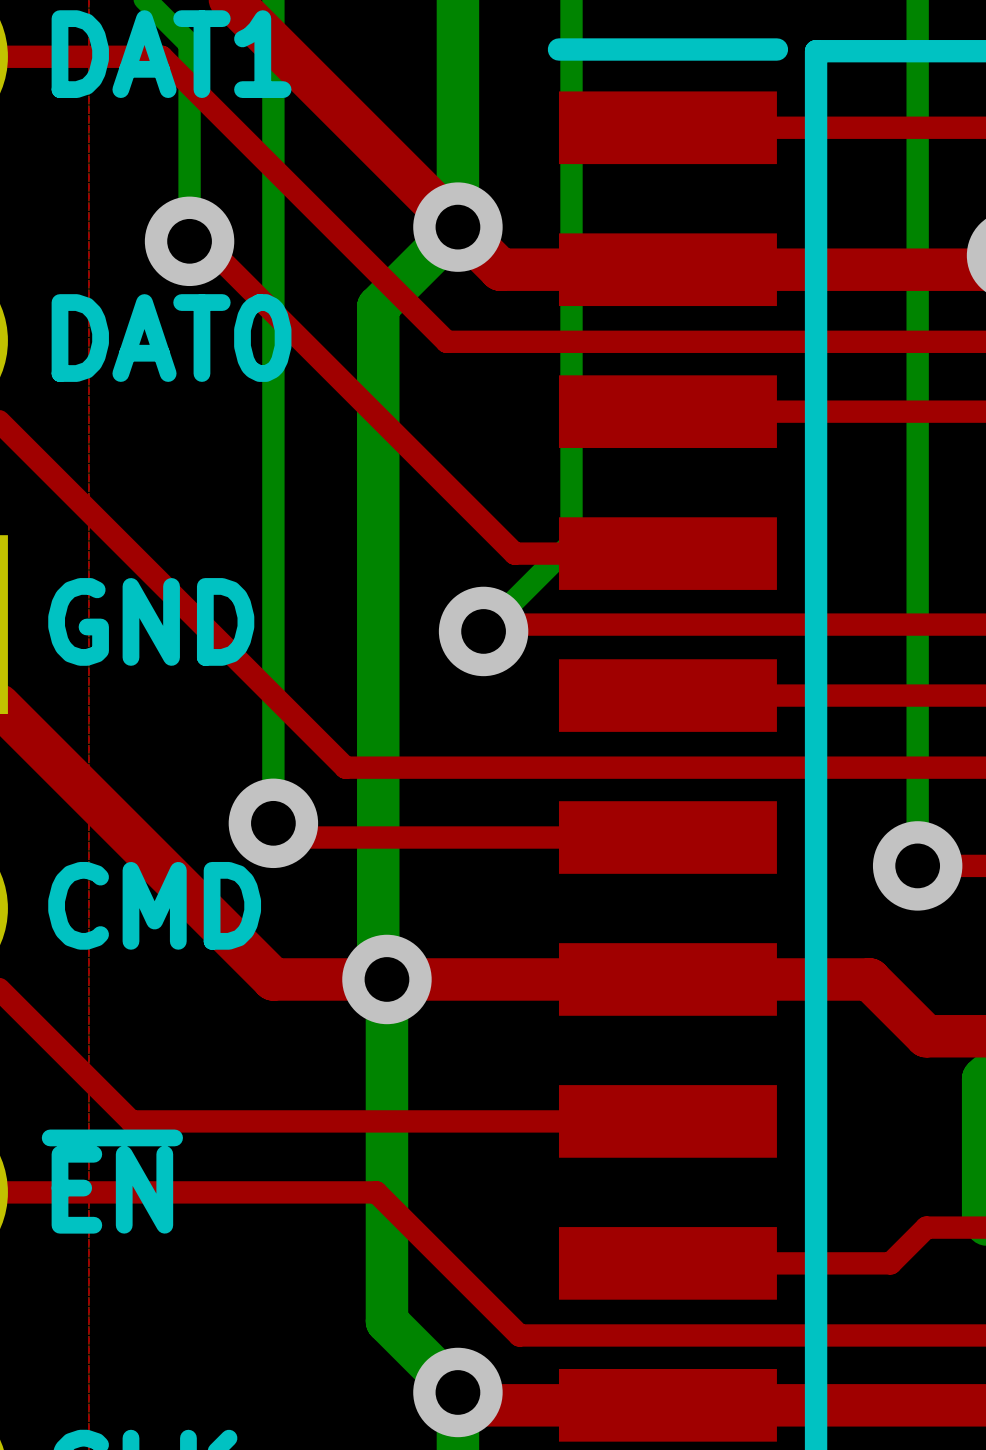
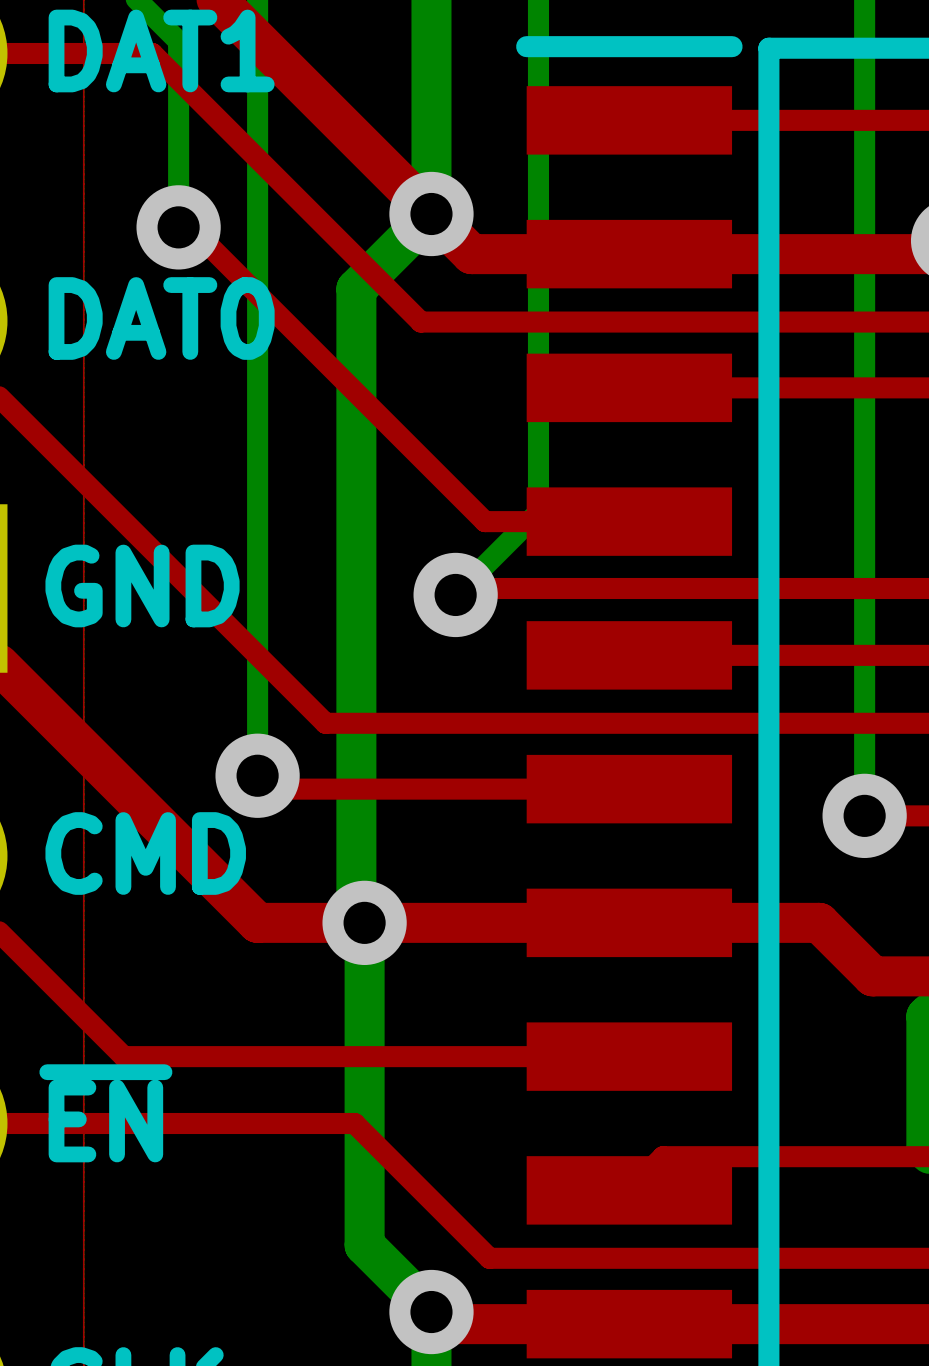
top track: (926, 1227) (890, 1263) (667, 1263) -> (872, 1156) (663, 1156) (629, 1190)

